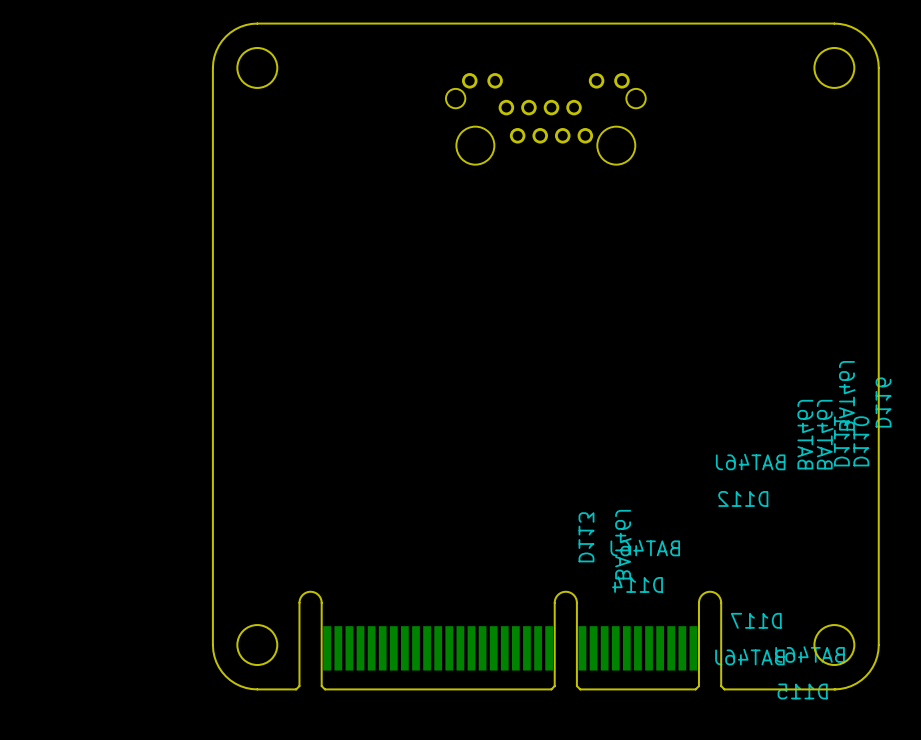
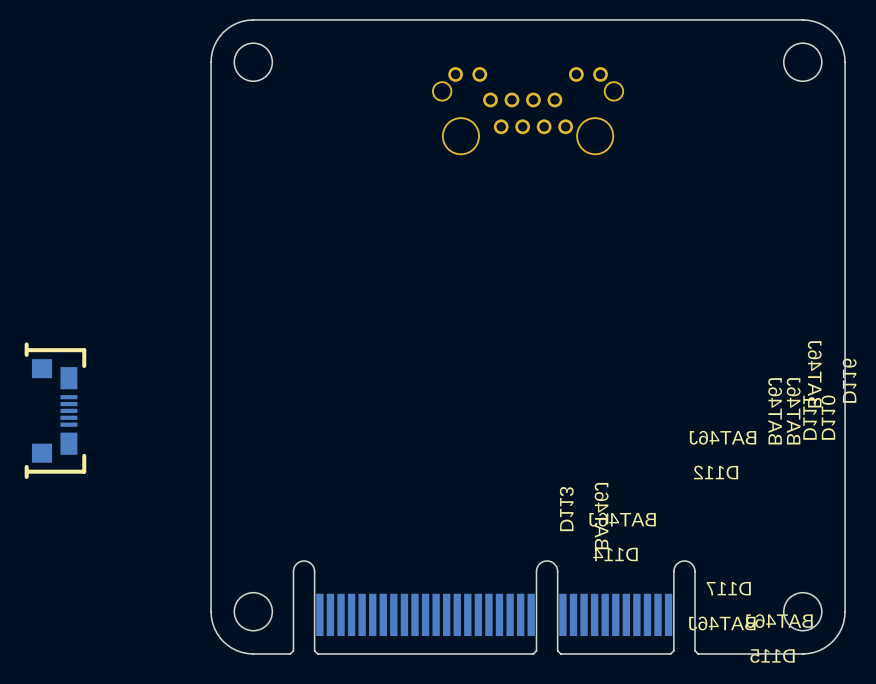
part: none -> (55, 410)

